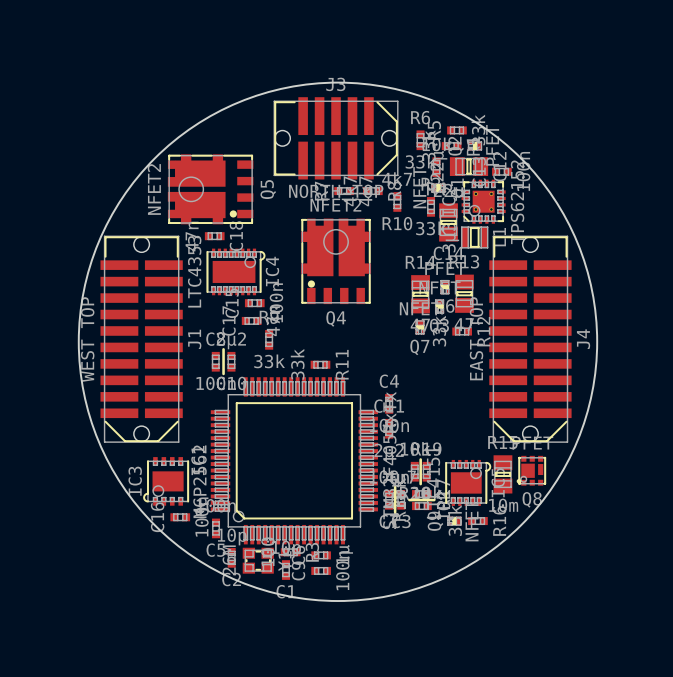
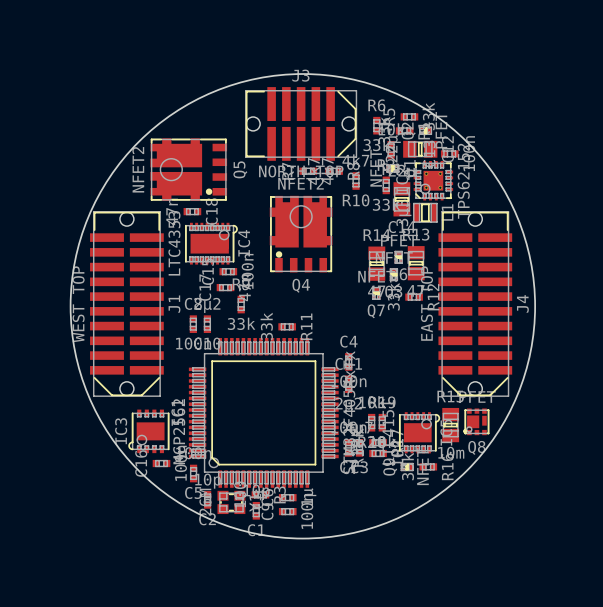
line: (223, 349) (223, 373) -> none
line: (420, 459) (420, 484) -> none
line: (395, 487) (395, 512) -> none
line: (409, 500) (434, 500) -> none

